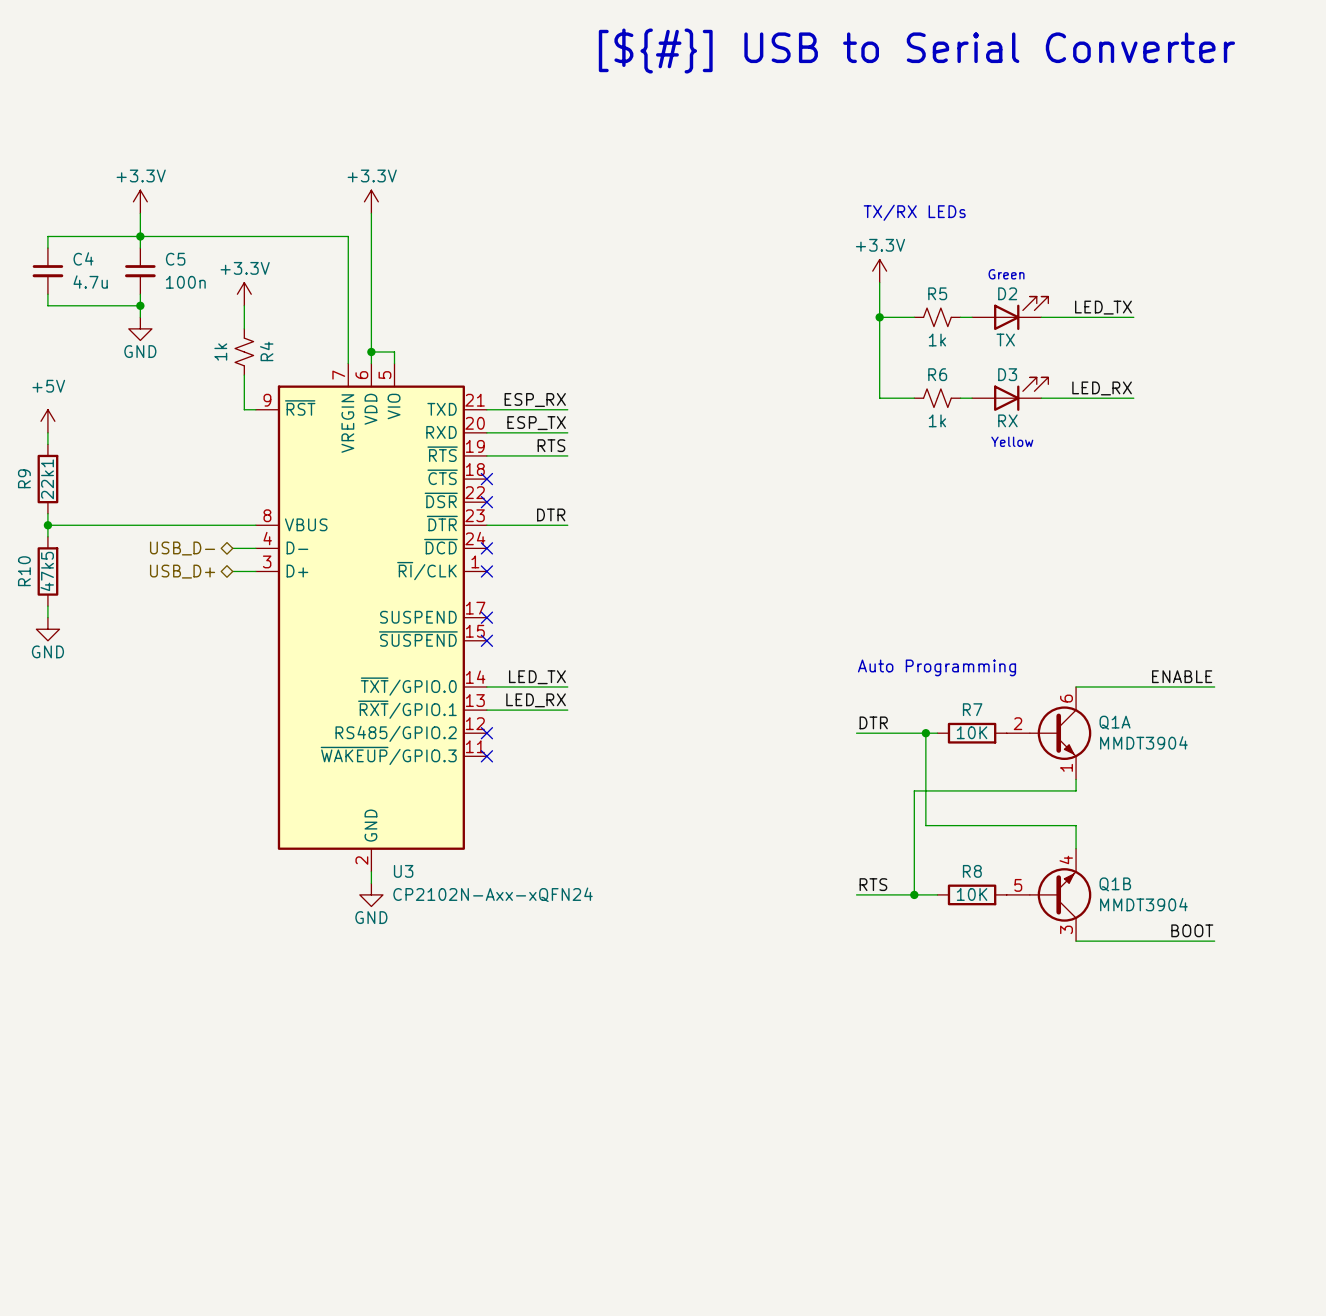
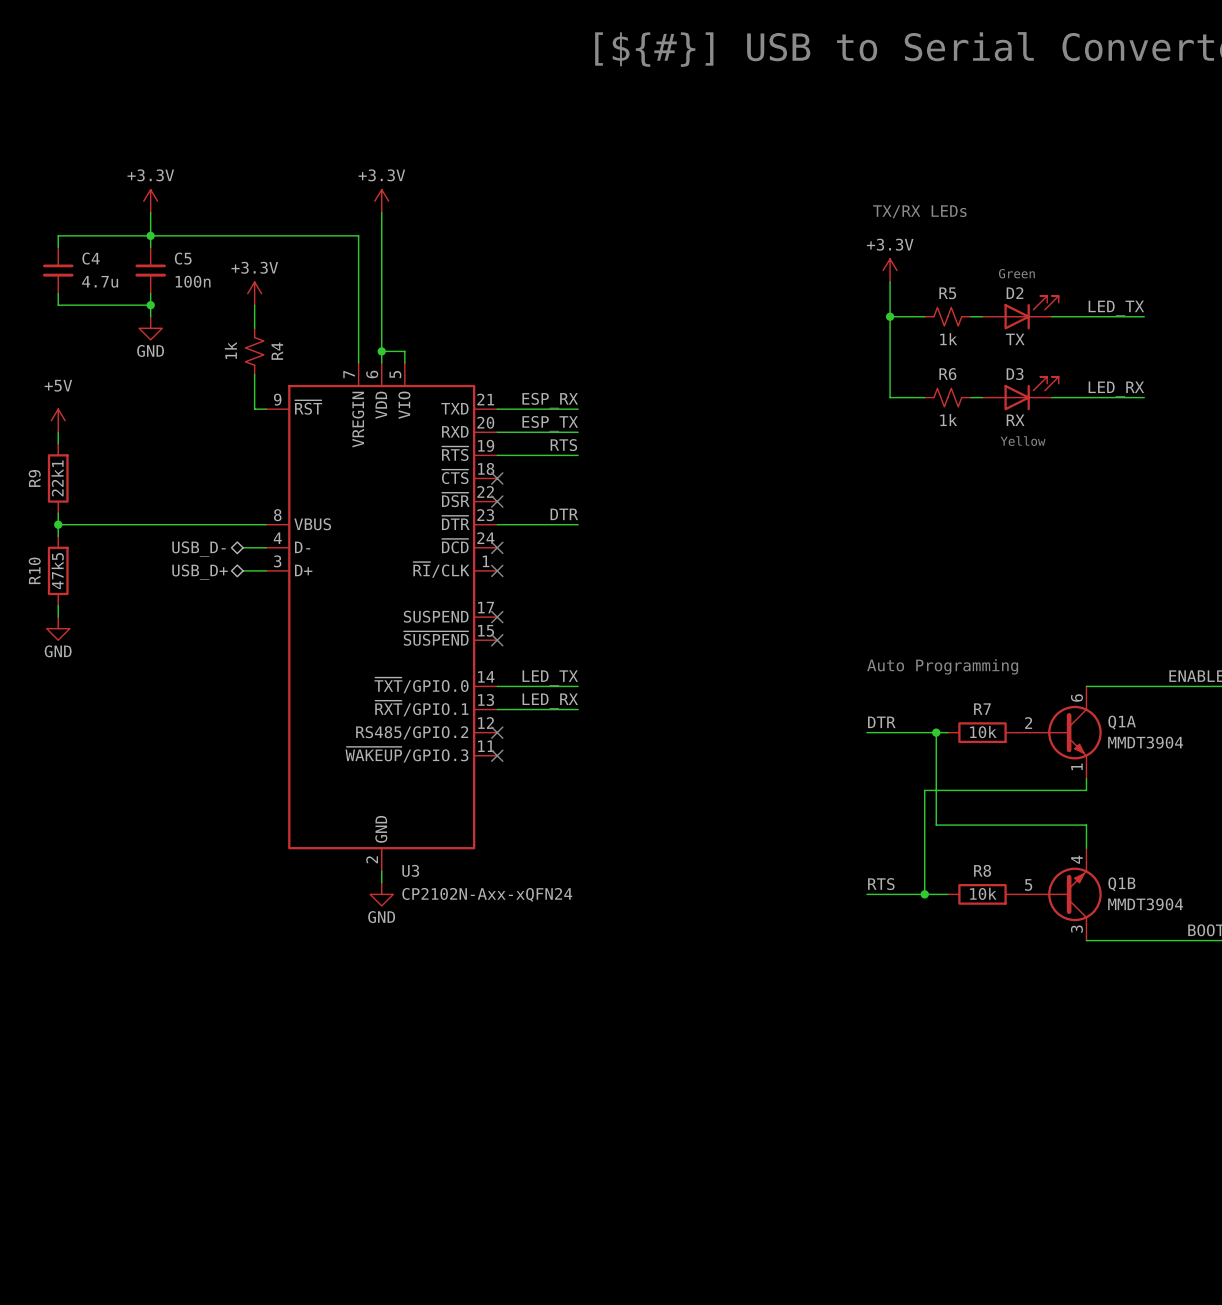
R7 value: 10K (972, 732) -> 10k (983, 732)
R8 value: 10K (972, 894) -> 10k (983, 893)

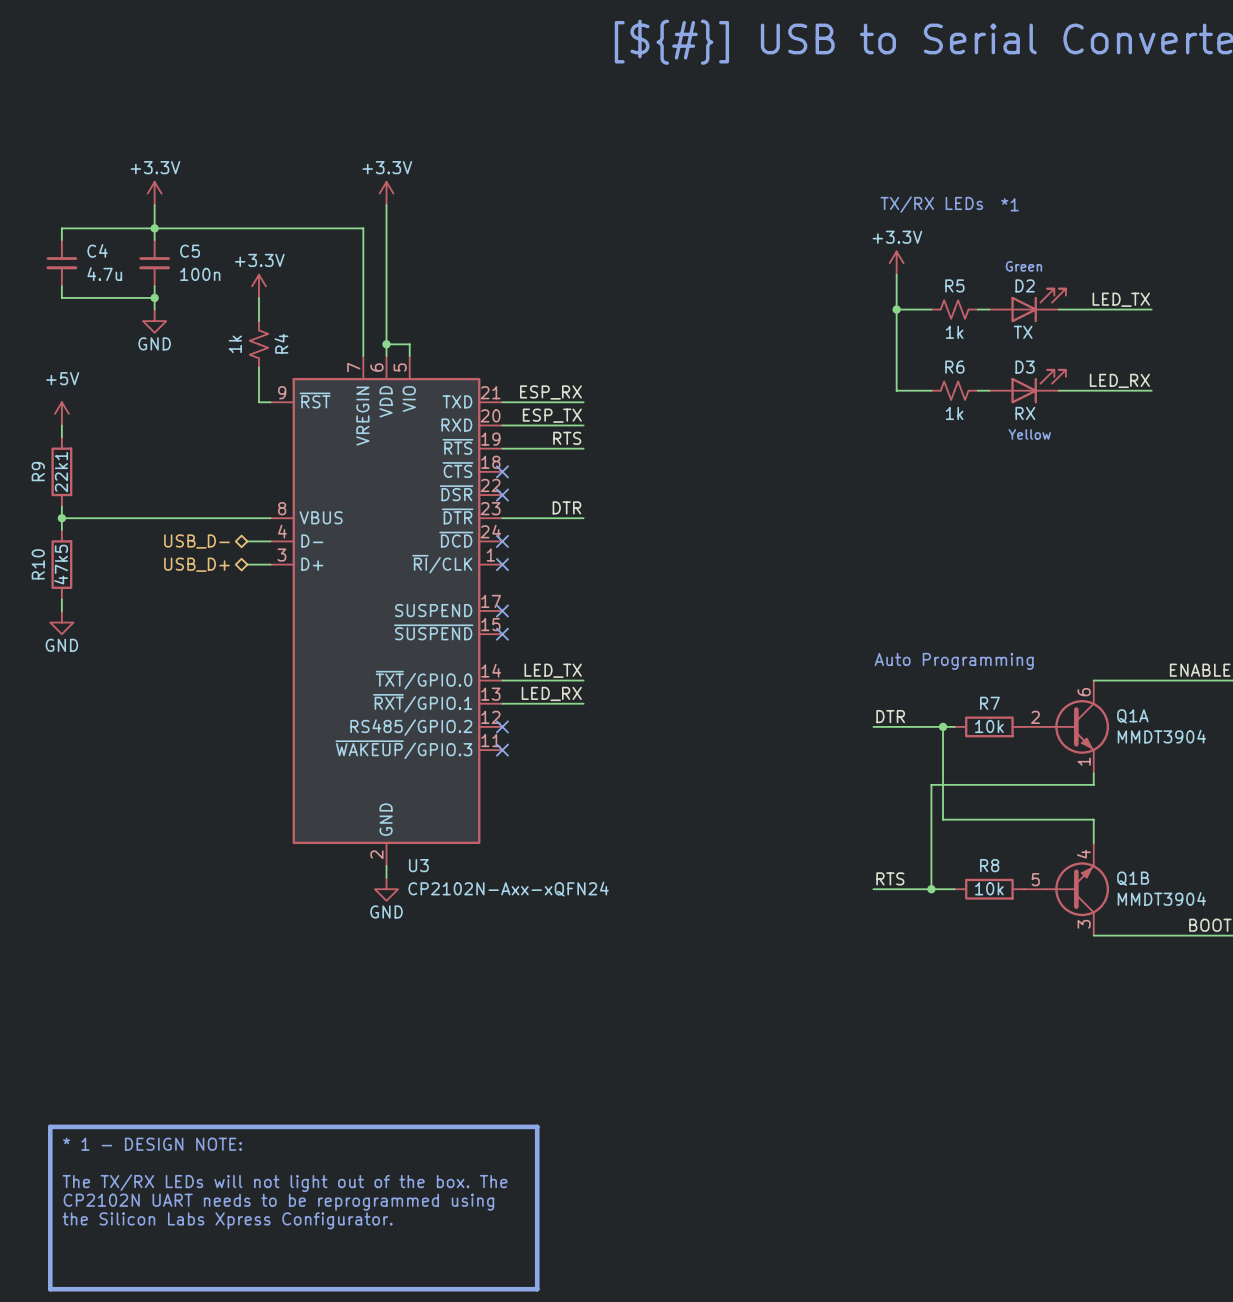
text: none -> *1 (1009, 204)
line: none -> (50, 1126) (537, 1126) (537, 1289) (50, 1289) (50, 1126)
text: none -> * 1 - DESIGN NOTE: (152, 1144)
text: none -> The TX/RX LEDs will not light out of the box. The (284, 1183)
text: none -> CP2102N UART needs to be reprogrammed using (278, 1202)
text: none -> the Silicon Labs Xpress Configurator. (227, 1220)

